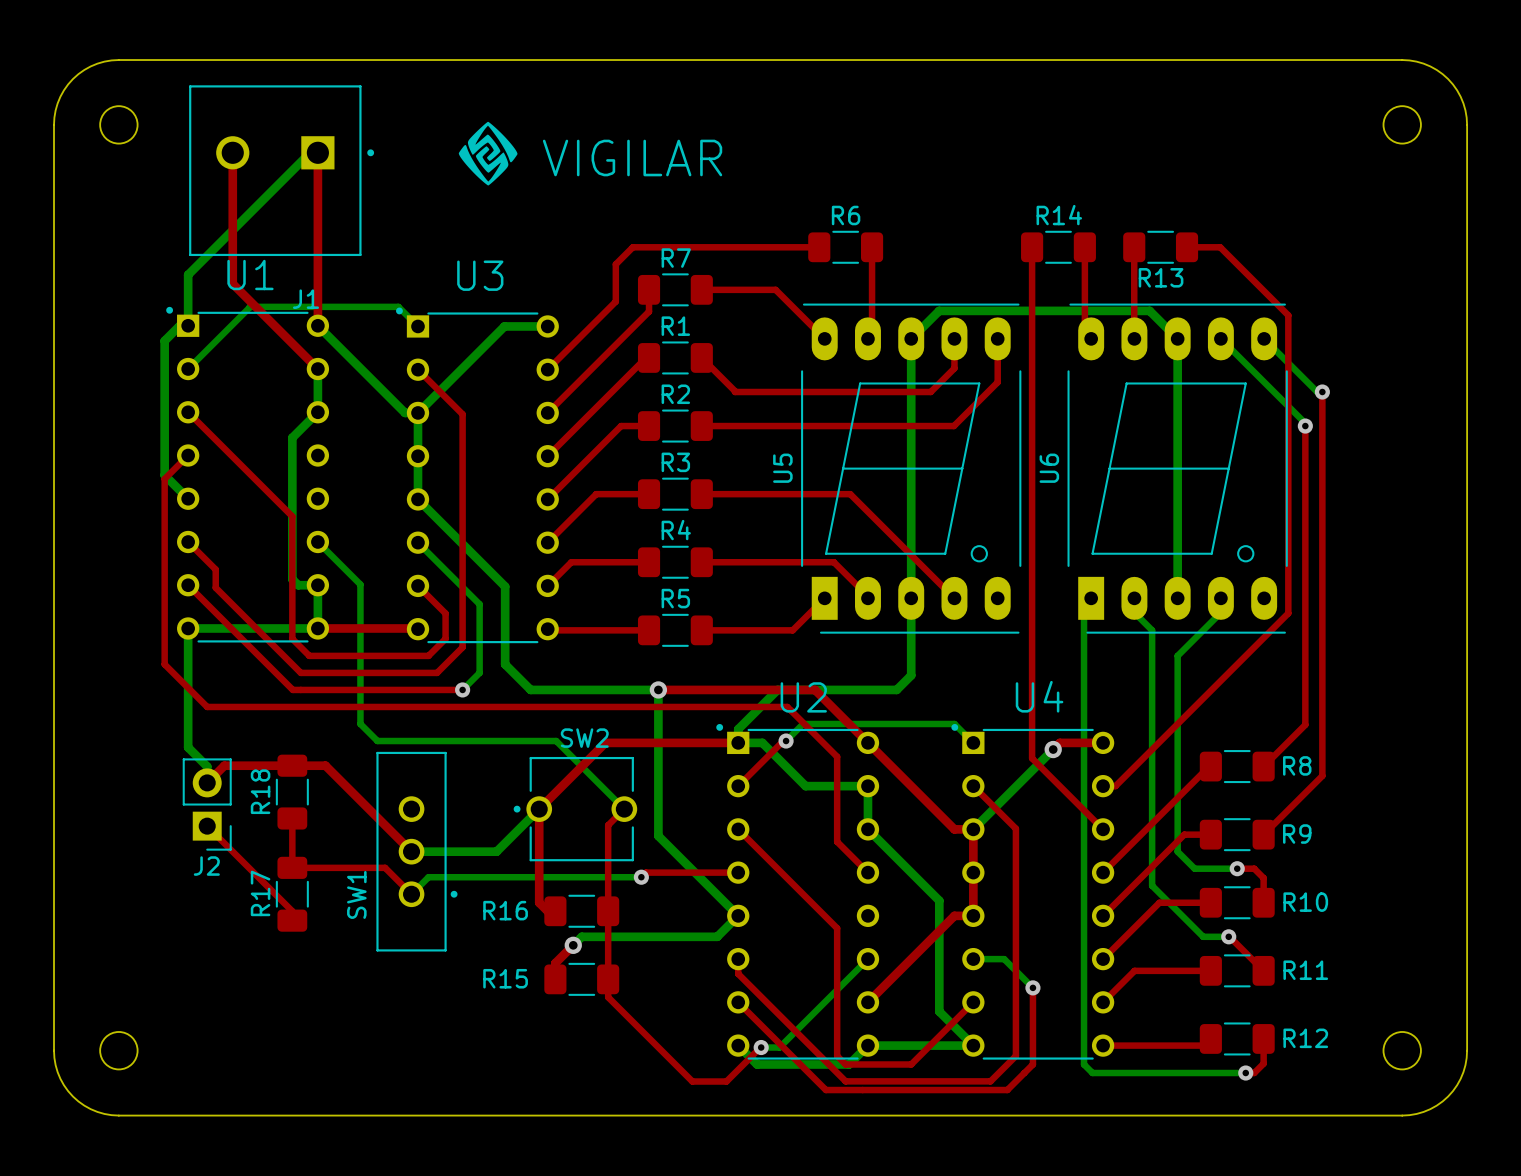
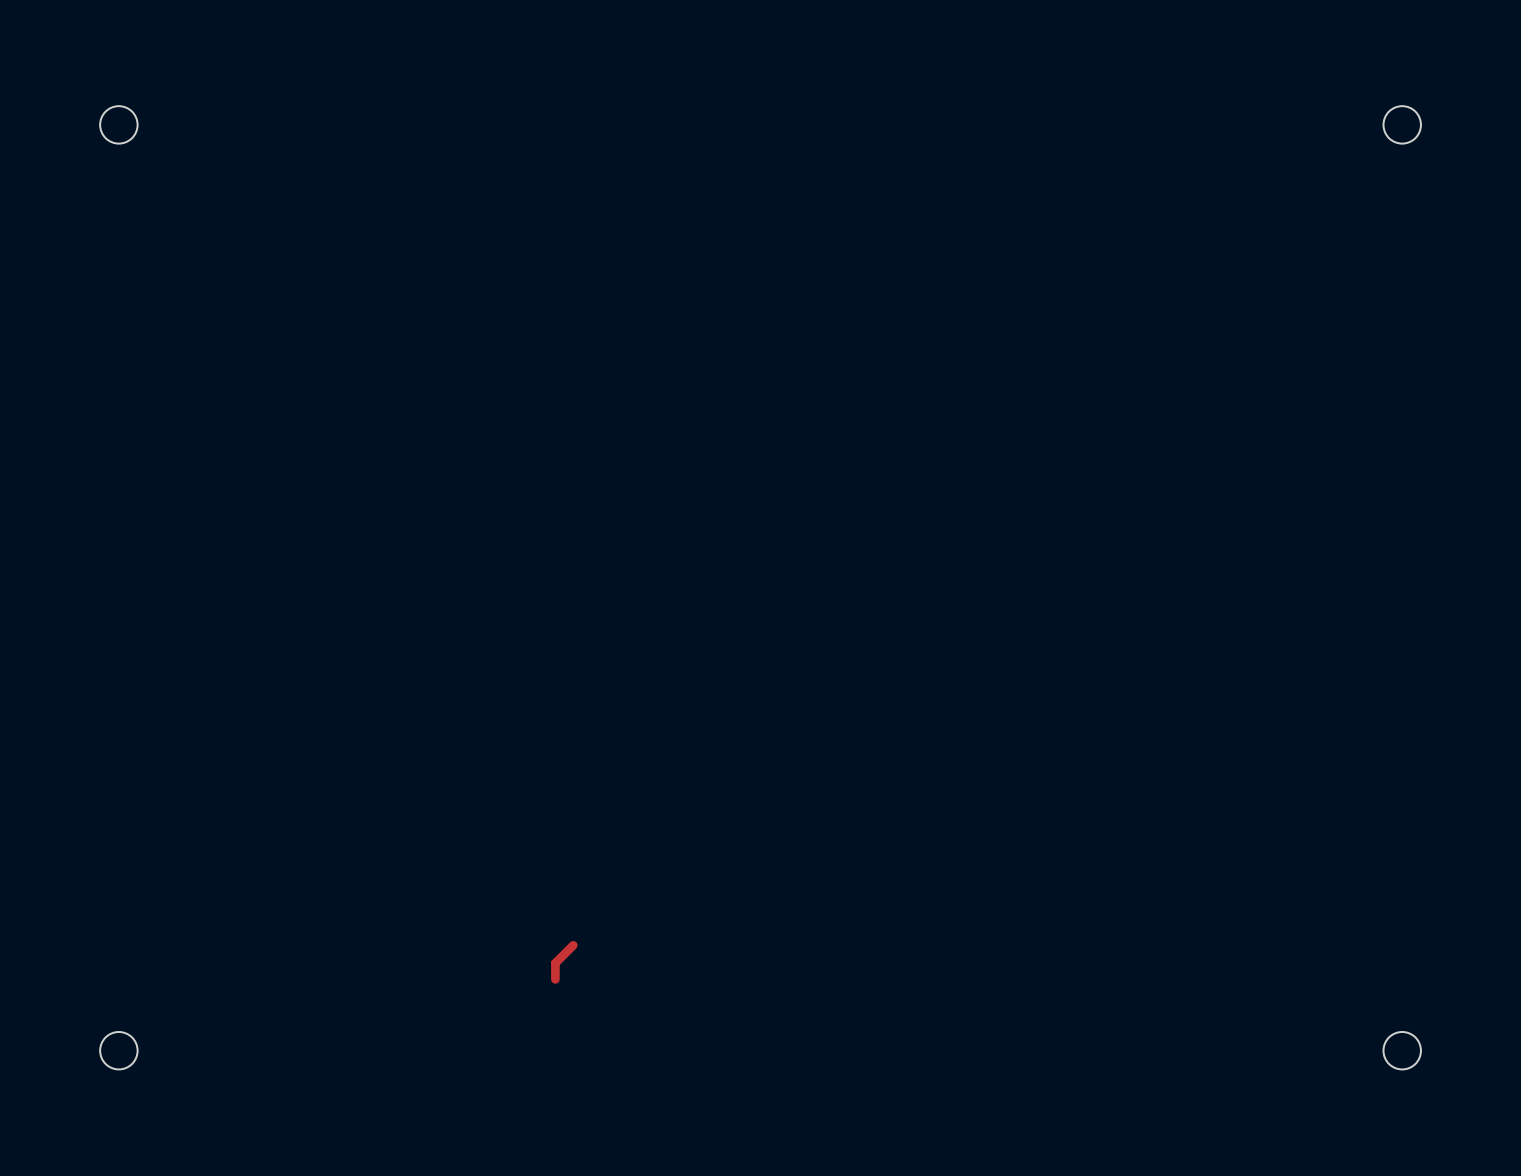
board edge: (118, 60) (1402, 60) (1423, 63) (1442, 74) (1452, 84) (1460, 96) (1465, 110) (1467, 124) (1467, 1050) (1463, 1072) (1452, 1091) (1442, 1101) (1430, 1109) (1416, 1113) (1402, 1115) (118, 1115) (97, 1111) (78, 1101) (68, 1091) (60, 1078) (55, 1065) (54, 1050) (54, 124) (57, 103) (63, 90) (73, 79) (84, 69) (97, 63) (118, 60) -> none
drawing: [458, 121, 518, 186] -> none
top track: (232, 152) (232, 283) (317, 369) -> none
top track: (317, 152) (317, 325) -> none
bottom track: (317, 152) (310, 152) (188, 274) (188, 325) (179, 325) (164, 340) (164, 475) (188, 498) -> none
text: VIGILAR (632, 157) -> none
J1: (281, 170) -> none
top track: (819, 247) (632, 247) (615, 264) (615, 301) (547, 369) -> none
R6: (845, 247) -> none
top track: (872, 247) (872, 334) (867, 338) -> none
top track: (1032, 247) (1032, 758) (1103, 829) -> none
R14: (1058, 247) -> none
top track: (1084, 247) (1084, 332) (1091, 338) -> none
top track: (1134, 247) (1134, 338) -> none
R13: (1160, 247) -> none
top track: (1187, 247) (1220, 247) (1288, 315) (1288, 613) (1115, 786) (1103, 786) -> none
top track: (649, 289) (649, 311) (547, 412) -> none
R7: (675, 289) -> none
top track: (701, 289) (775, 289) (824, 338) -> none
bottom track: (317, 325) (405, 412) (418, 412) -> none
bottom track: (418, 326) (398, 306) (249, 306) (188, 369) -> none
bottom track: (547, 326) (504, 326) (418, 412) -> none
top track: (954, 338) (954, 368) (930, 392) (735, 392) (701, 357) -> none
top track: (997, 338) (997, 382) (953, 426) (701, 426) -> none
bottom track: (1220, 338) (1305, 423) (1305, 426) -> none
bottom track: (1264, 338) (1317, 392) (1322, 392) -> none
top track: (649, 357) (645, 357) (547, 456) -> none
R1: (675, 357) -> none
bottom track: (317, 369) (317, 412) (292, 437) (292, 579) (298, 585) (317, 585) (317, 628) (188, 628) (188, 747) (207, 766) (207, 782) -> none
top track: (418, 369) (462, 414) (462, 647) (437, 672) (300, 672) (215, 587) (215, 569) (188, 541) -> none
top track: (1322, 392) (1322, 775) (1263, 834) -> none
via: (1322, 392) -> none
top track: (188, 412) (292, 516) (292, 638) (309, 655) (428, 655) (445, 638) (445, 613) (418, 585) -> none
bottom track: (418, 412) (418, 499) (505, 586) (505, 664) (530, 689) (658, 689) (658, 836) (738, 915) (717, 936) (581, 936) (573, 945) -> none
top track: (649, 426) (621, 426) (547, 499) -> none
R2: (675, 426) -> none
top track: (1305, 426) (1305, 724) (1263, 766) -> none
via: (1305, 426) -> none
top track: (186, 455) (188, 455) (164, 479) (164, 664) (207, 706) (787, 706) (837, 756) (837, 841) (867, 872) -> none
U5: (911, 468) -> none
U6: (1177, 468) -> none
U1: (247, 474) -> none
U3: (477, 475) -> none
top track: (649, 494) (596, 494) (547, 542) -> none
R3: (675, 494) -> none
top track: (701, 494) (850, 494) (954, 598) -> none
bottom track: (317, 541) (360, 584) (360, 723) (377, 741) (556, 741) (624, 809) -> none
bottom track: (418, 542) (479, 604) (479, 672) (462, 689) -> none
top track: (649, 562) (571, 562) (547, 585) -> none
R4: (675, 562) -> none
top track: (701, 562) (833, 562) (867, 598) -> none
top track: (188, 585) (292, 689) (462, 689) -> none
top track: (824, 598) (792, 630) (701, 630) -> none
bottom track: (1091, 598) (1084, 605) (1084, 1064) (1092, 1073) (1245, 1073) -> none
bottom track: (1134, 598) (1134, 612) (1152, 630) (1152, 885) (1203, 936) (1228, 936) -> none
bottom track: (1177, 598) (1177, 338) (1149, 310) (939, 310) (911, 338) (911, 675) (896, 689) (777, 689) (738, 729) (738, 742) (762, 742) (805, 786) (867, 786) (867, 829) (939, 900) (939, 1011) (973, 1045) (867, 1045) (849, 1064) (757, 1064) (738, 1045) -> none
bottom track: (1220, 598) (1220, 612) (1177, 655) (1177, 851) (1194, 868) (1237, 868) -> none
top track: (317, 628) (418, 629) -> none
top track: (547, 629) (649, 630) -> none
R5: (675, 630) -> none
via: (462, 689) -> none
top track: (658, 689) (815, 689) (954, 829) (973, 829) (973, 915) (954, 915) (867, 1002) -> none
via: (658, 689) -> none
top track: (786, 741) (783, 741) (738, 786) -> none
bottom track: (786, 741) (803, 723) (954, 723) (973, 742) -> none
via: (786, 741) -> none
top track: (738, 742) (605, 742) (539, 809) (539, 902) (547, 911) (555, 911) -> none
top track: (1103, 742) (1059, 742) (1053, 749) -> none
bottom track: (1053, 749) (973, 829) -> none
via: (1053, 749) -> none
top track: (1210, 766) (1103, 872) -> none
R8: (1237, 766) -> none
top track: (207, 782) (224, 765) (325, 765) (411, 851) -> none
top track: (973, 786) (1015, 828) (1015, 1055) (990, 1081) (845, 1081) (738, 973) (738, 959) -> none
R18: (292, 792) -> none
J2: (207, 804) -> none
bottom track: (539, 809) (496, 851) (411, 851) -> none
SW2: (575, 809) -> none
top track: (624, 809) (608, 825) (608, 997) (692, 1081) (726, 1081) (761, 1047) -> none
top track: (292, 818) (292, 867) (385, 867) (411, 894) -> none
top track: (207, 826) (292, 911) (292, 920) -> none
top track: (738, 829) (837, 928) (837, 1055) (845, 1064) (911, 1064) (973, 1002) -> none
top track: (1210, 834) (1184, 834) (1103, 915) -> none
R9: (1237, 834) -> none
SW1: (416, 851) -> none
top track: (1237, 868) (1254, 868) (1263, 878) (1263, 902) -> none
via: (1237, 868) -> none
top track: (738, 872) (645, 872) (641, 877) -> none
bottom track: (641, 877) (428, 877) (411, 894) -> none
via: (641, 877) -> none
U2: (797, 891) -> none
U4: (1032, 891) -> none
R17: (292, 894) -> none
top track: (1210, 902) (1159, 902) (1103, 959) -> none
R10: (1237, 902) -> none
R16: (581, 911) -> none
top track: (1228, 936) (1263, 970) -> none
via: (1228, 936) -> none
via: (573, 945) -> none
bottom track: (867, 959) (779, 1047) (761, 1047) -> none
bottom track: (973, 959) (1004, 959) (1032, 987) -> none
top track: (1210, 970) (1134, 970) (1103, 1002) -> none
R11: (1237, 970) -> none
R15: (581, 979) -> none
top track: (1032, 987) (1032, 1064) (1007, 1090) (825, 1090) (738, 1002) -> none
via: (1032, 987) -> none
top track: (1210, 1038) (1204, 1045) (1103, 1045) -> none
R12: (1237, 1038) -> none
top track: (1263, 1038) (1263, 1063) (1254, 1073) (1245, 1073) -> none
via: (761, 1047) -> none
via: (1245, 1073) -> none

